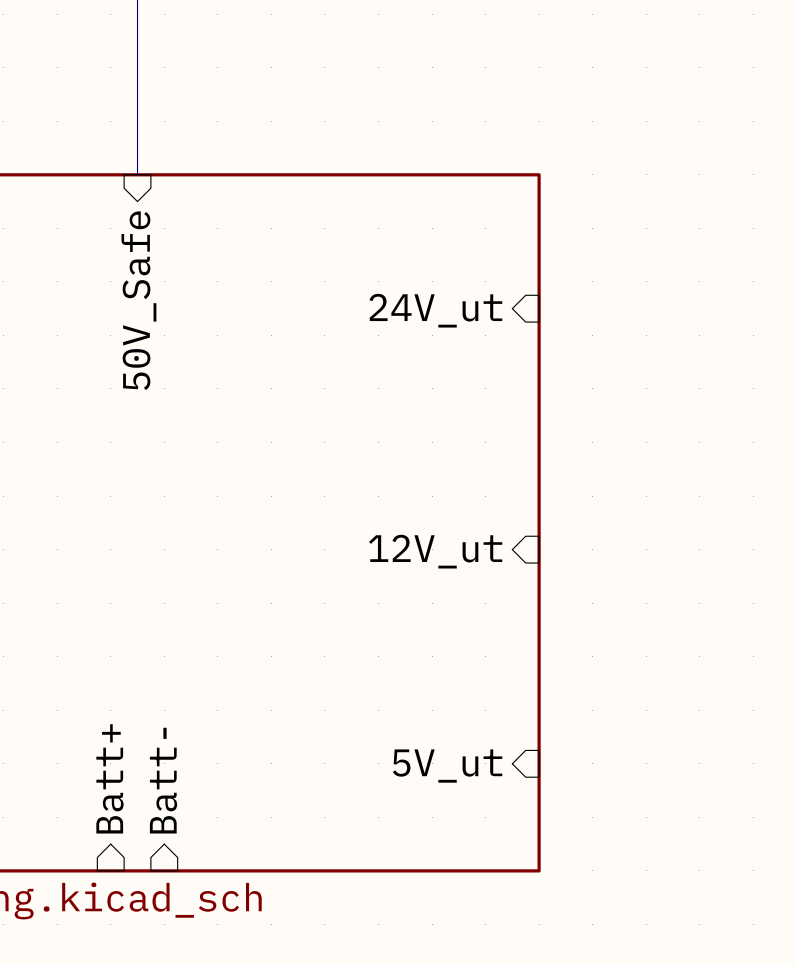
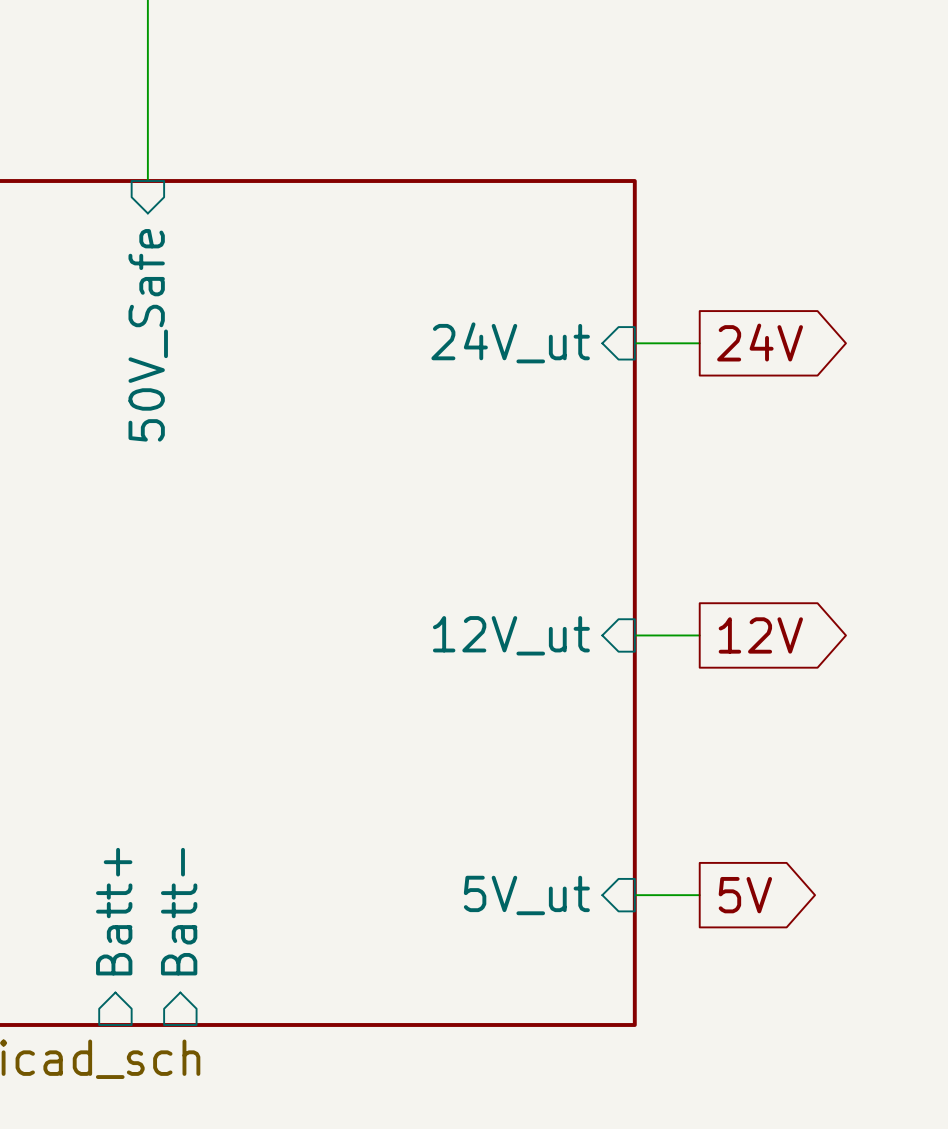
wire: none -> (634, 343) (699, 343)
global label: none -> 24V (760, 342)
wire: none -> (634, 635) (699, 635)
global label: none -> 12V (760, 635)
wire: none -> (634, 895) (699, 895)
global label: none -> 5V (745, 895)

